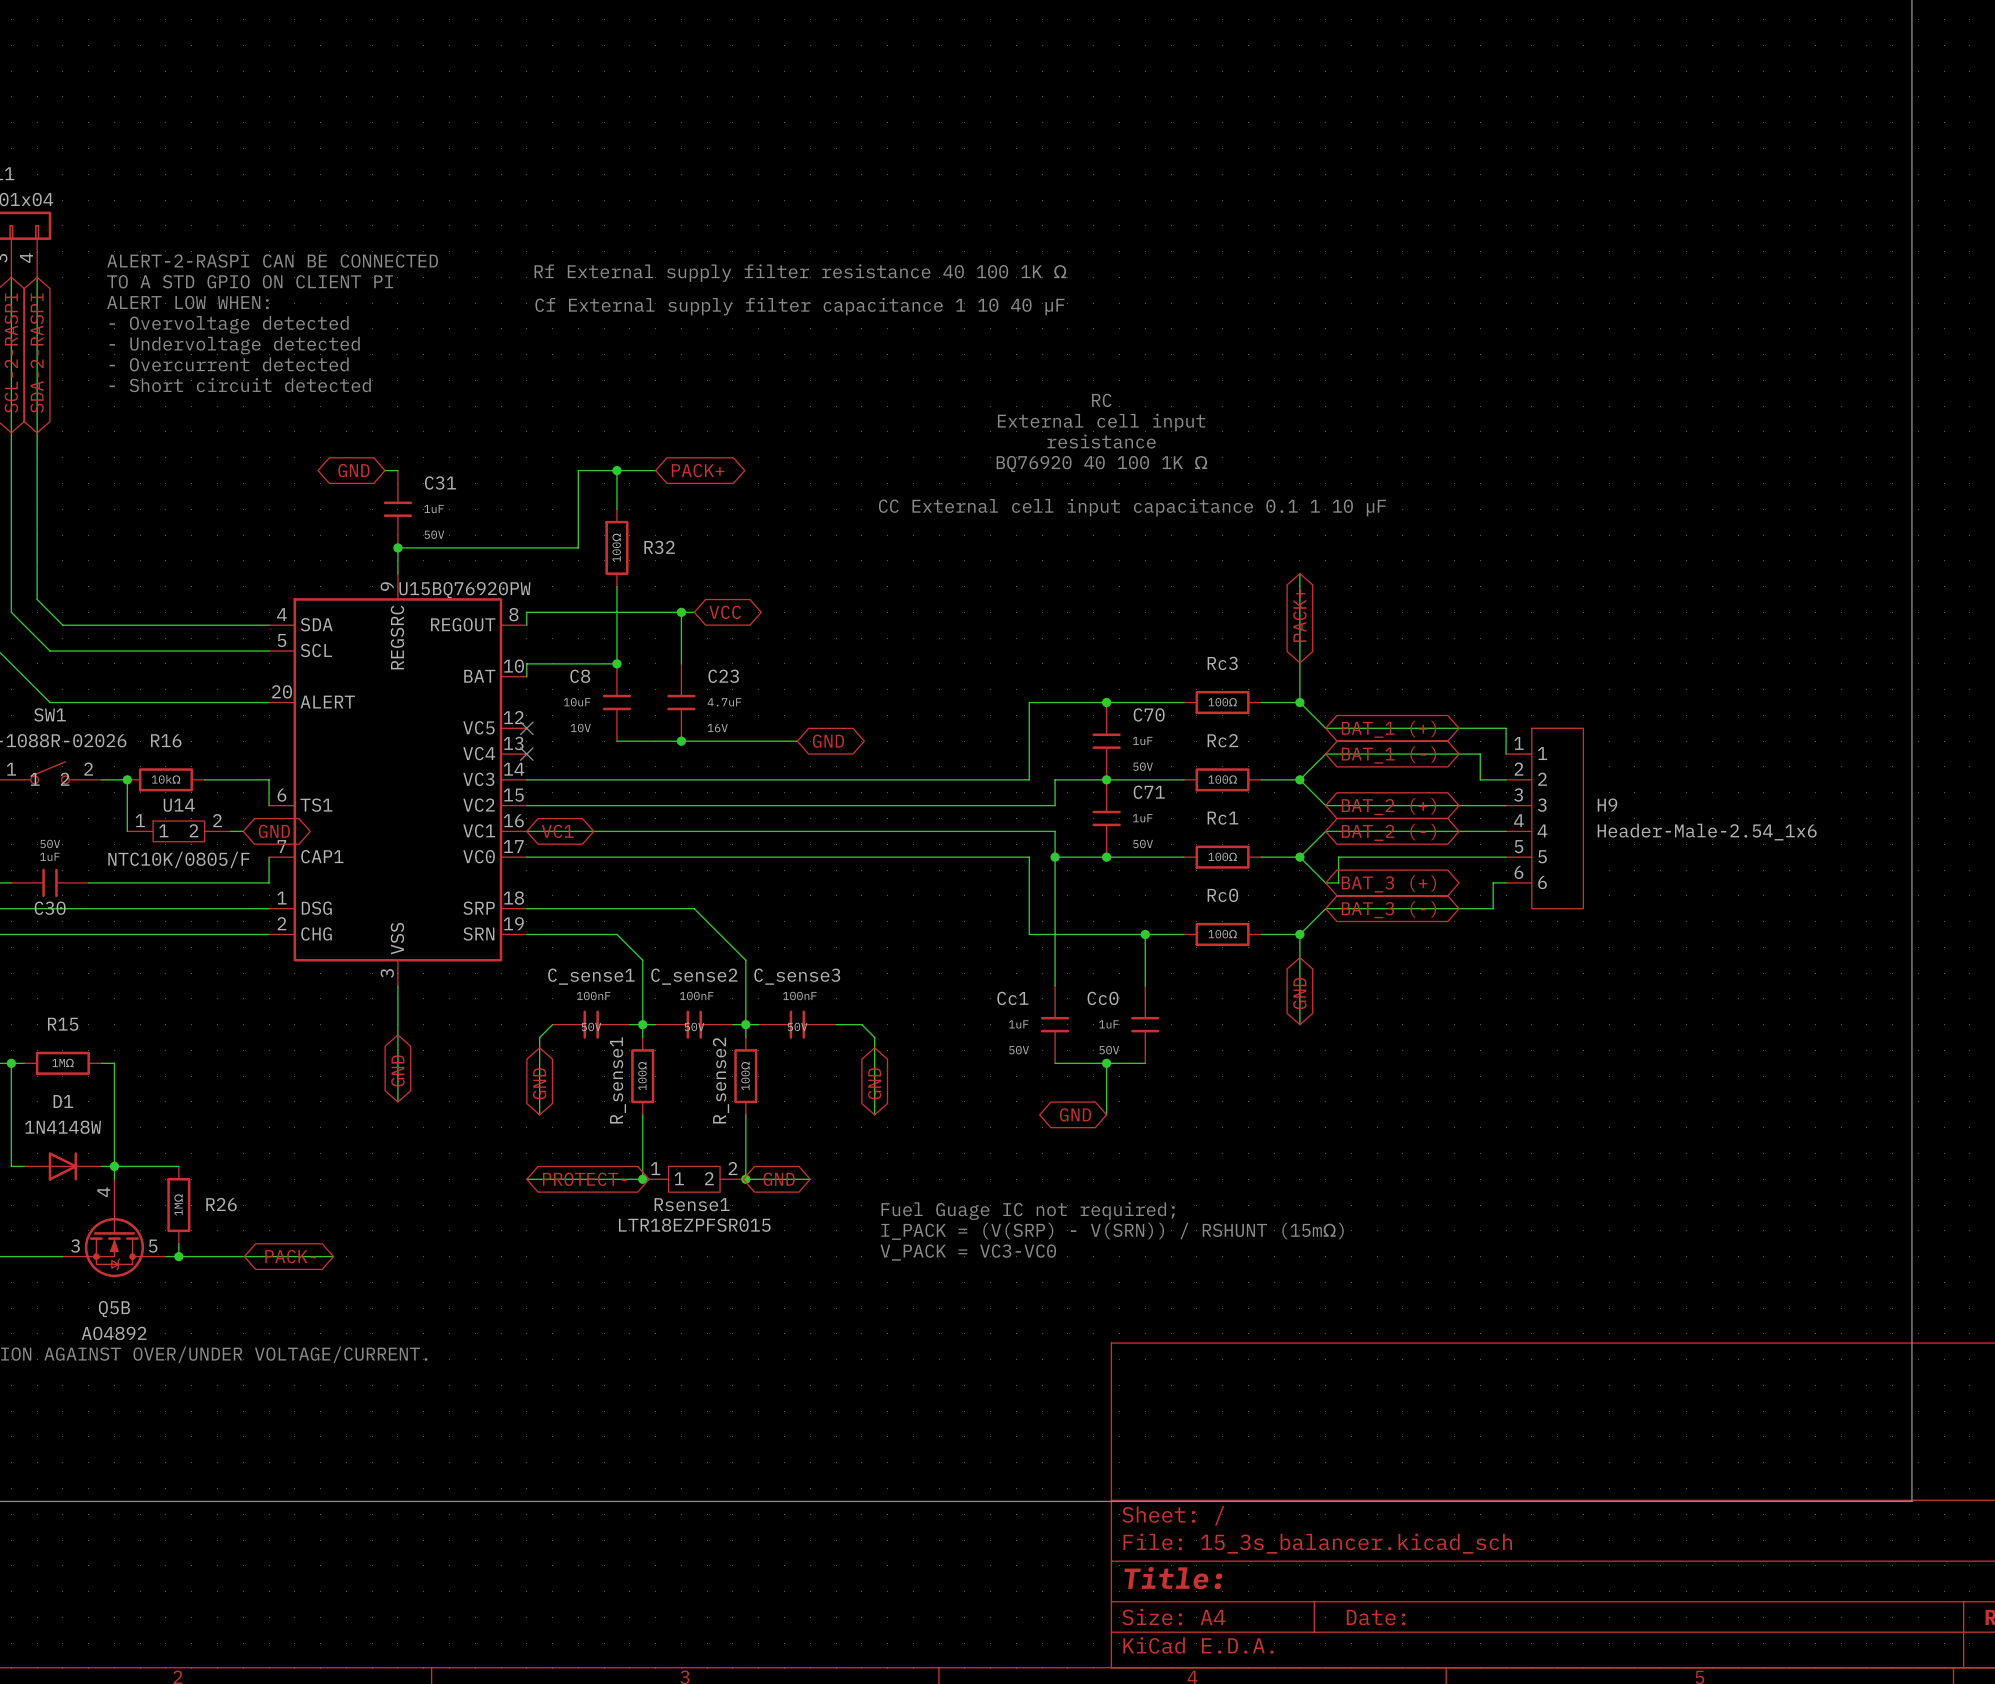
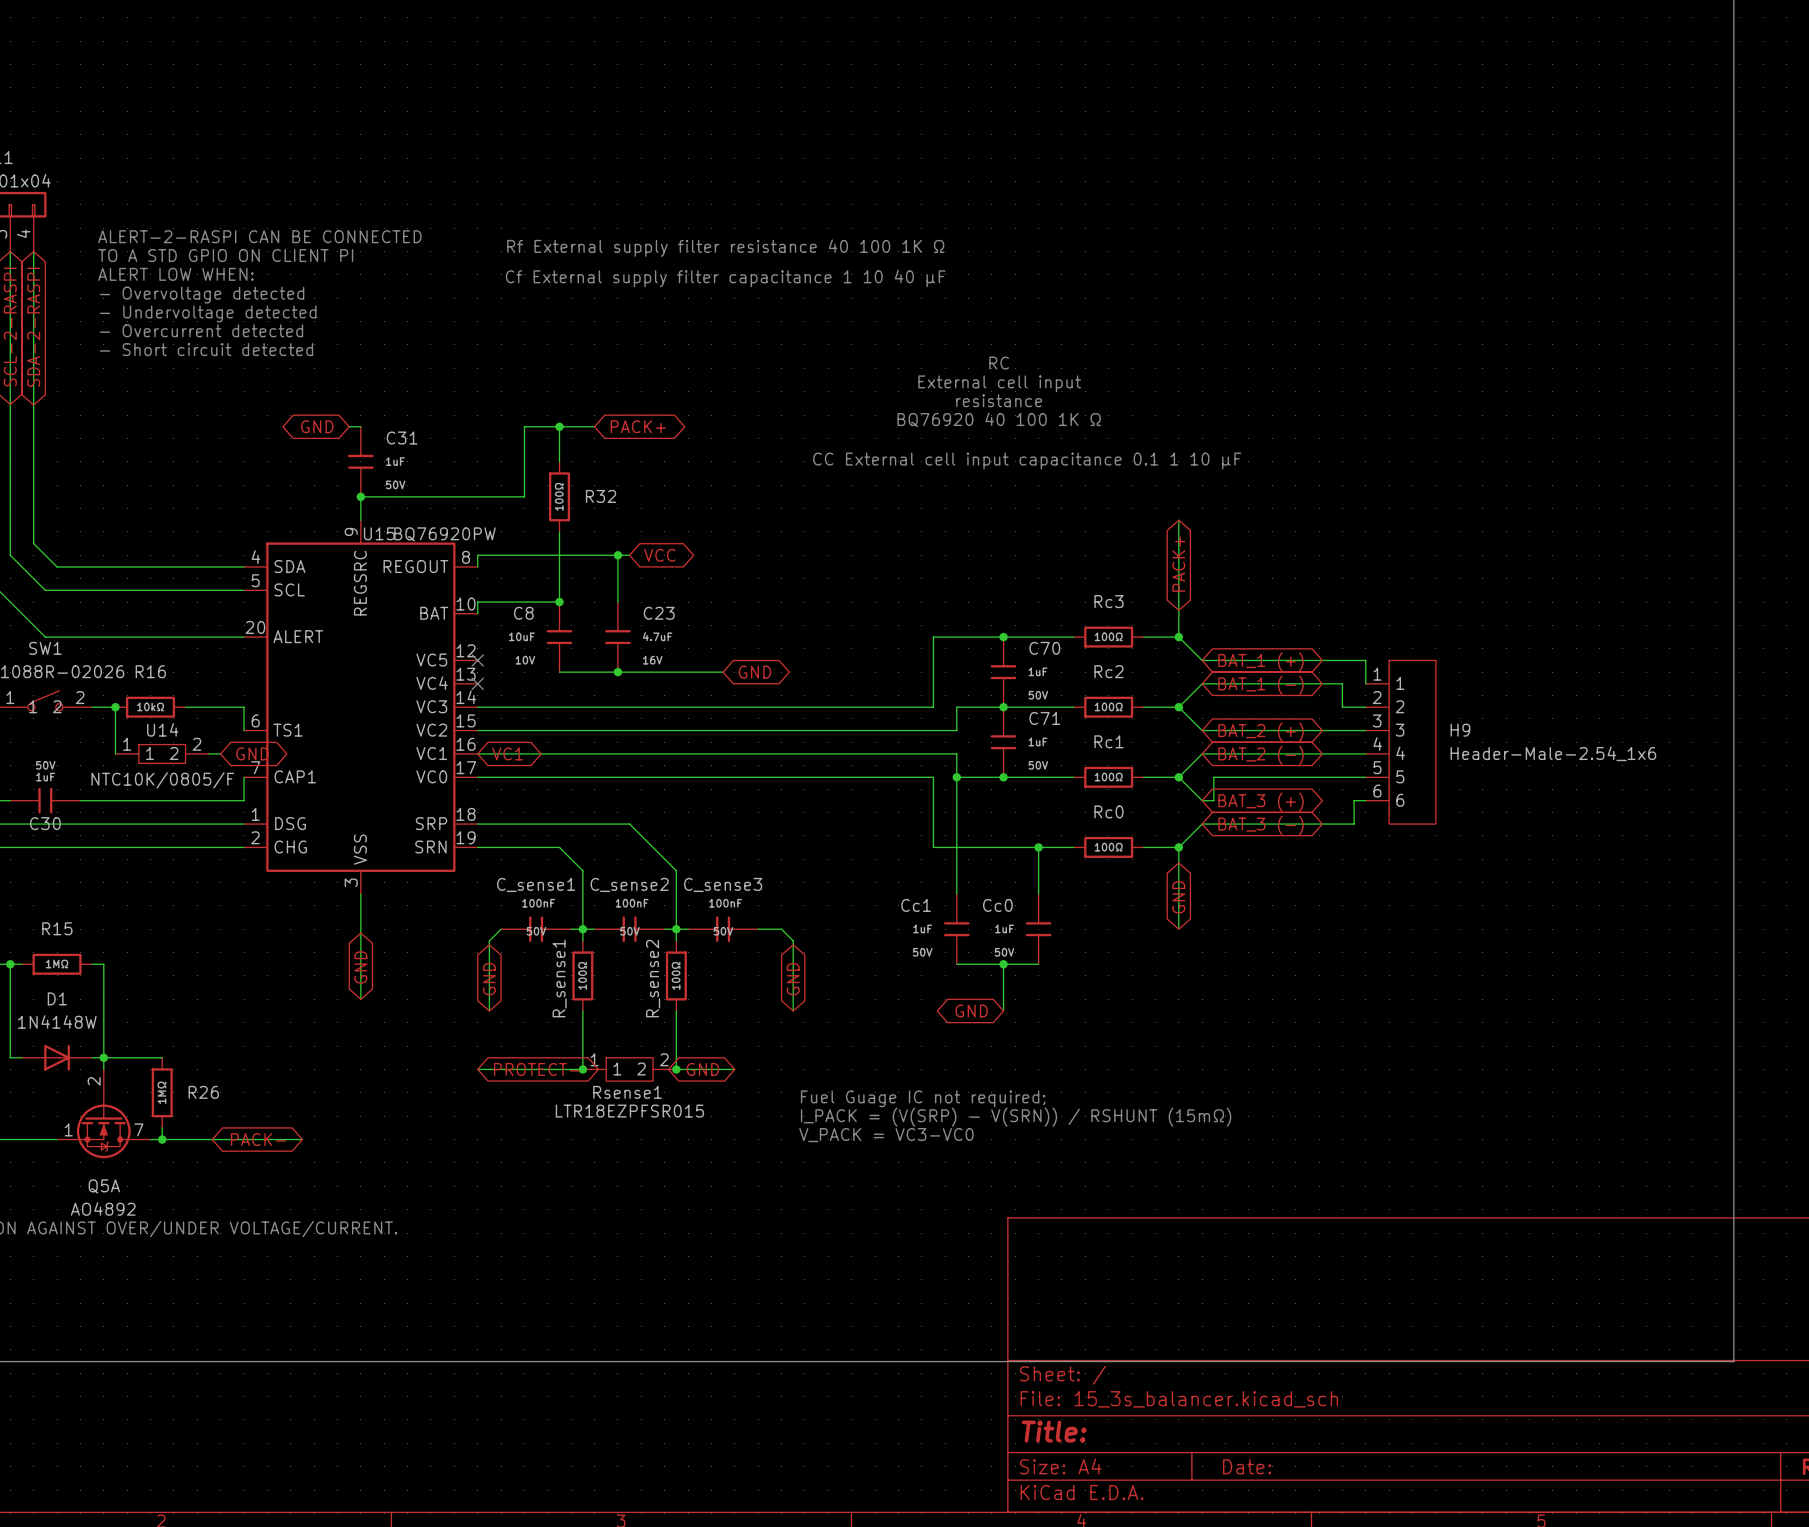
Q5B pin number: 4 (103, 1192) -> 2 (94, 1081)
Q5B pin number: 3 (75, 1245) -> 1 (68, 1129)
Q5B pin number: 5 (153, 1246) -> 7 (138, 1129)
Q5B name: Q5B (114, 1309) -> Q5A (104, 1186)

